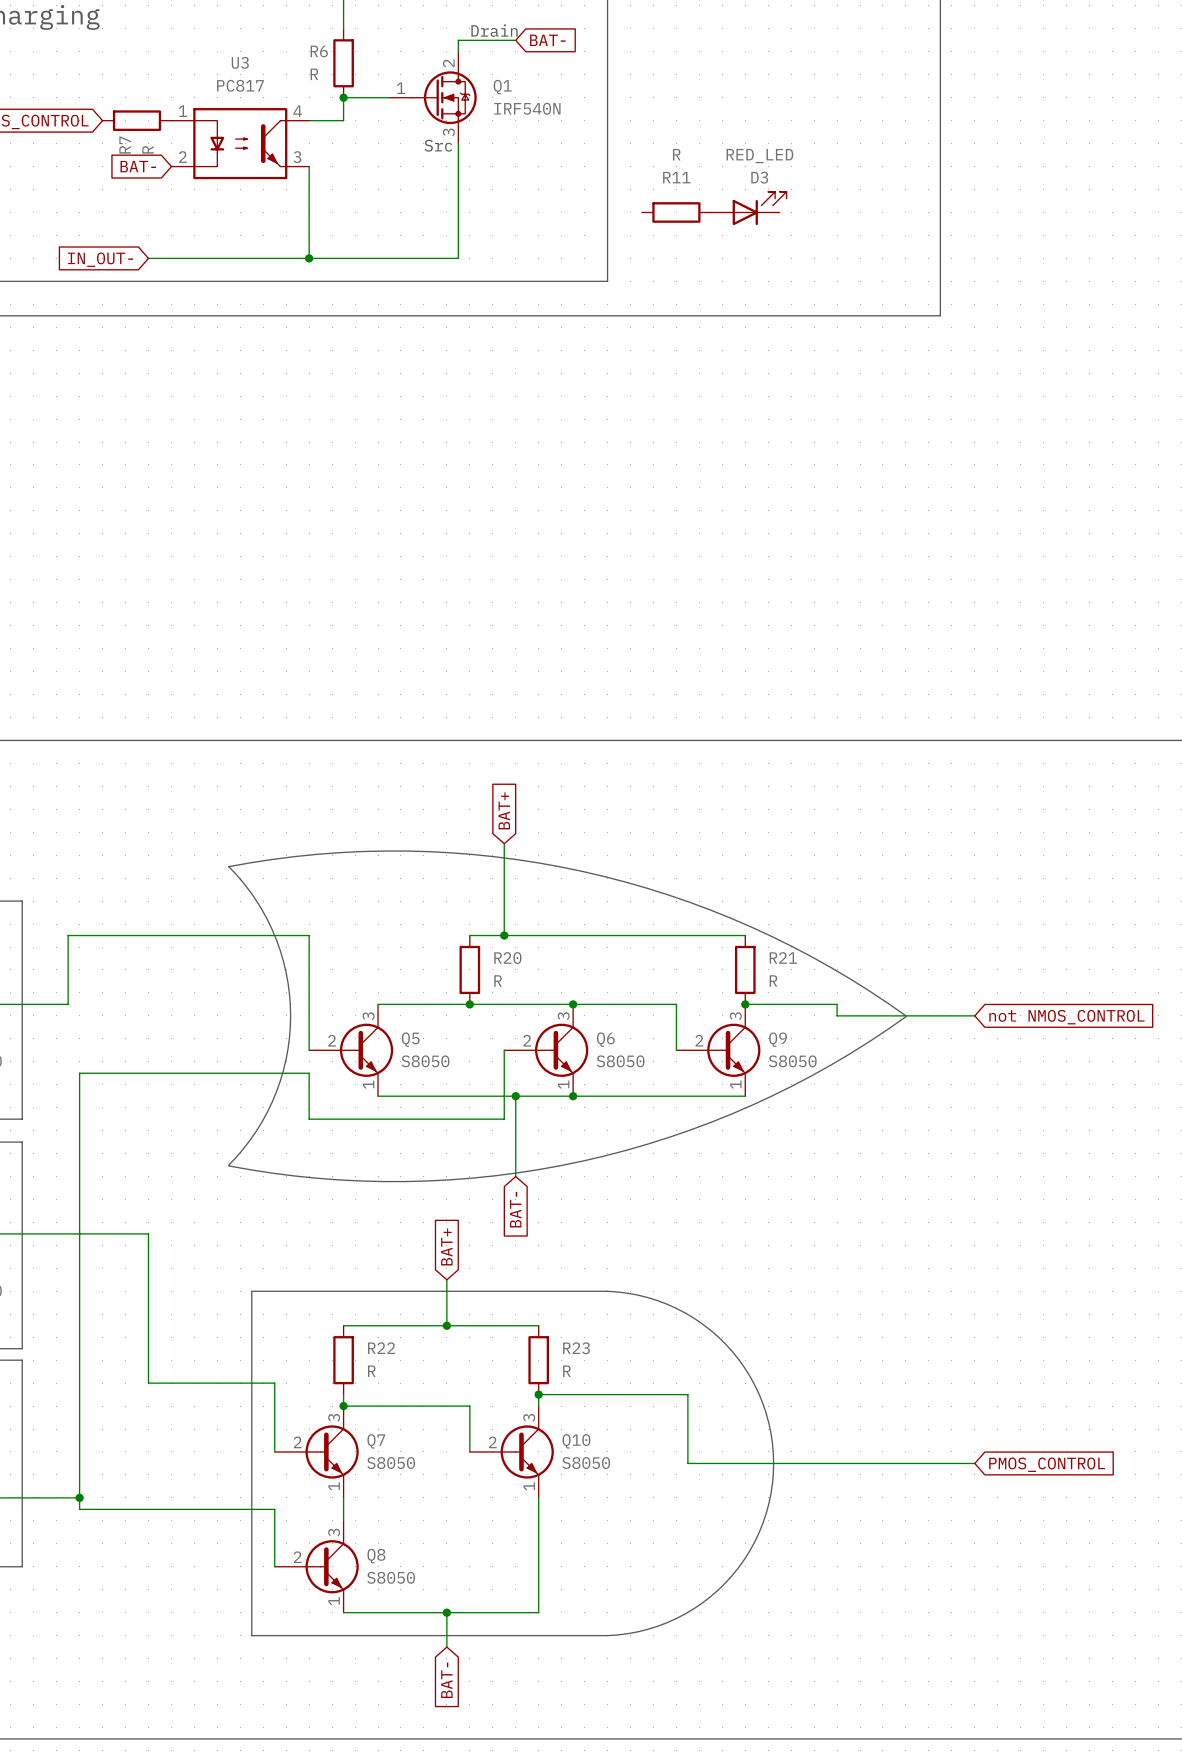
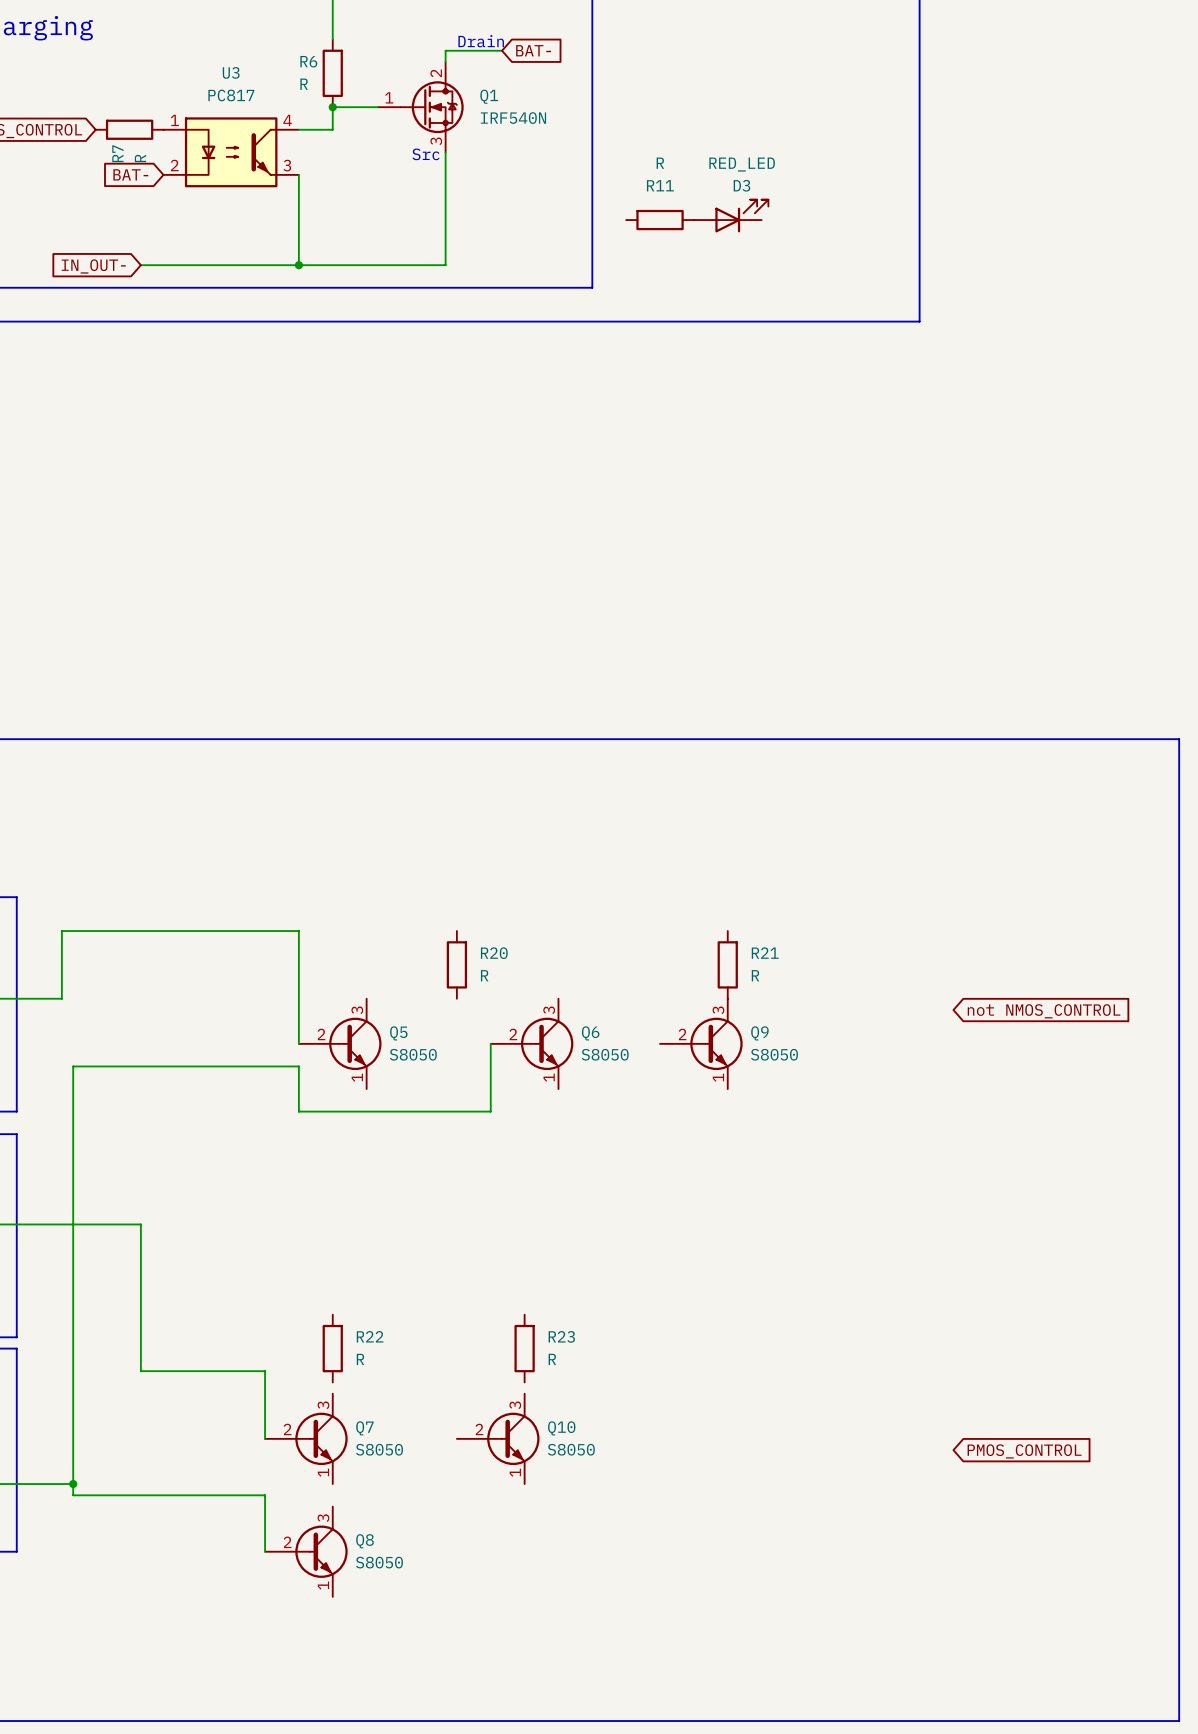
global label: BAT+ (504, 810) -> none
wire: (504, 843) (504, 935) -> none
wire: (469, 935) (745, 935) -> none
junction: (504, 935) -> none
wire: (378, 1004) (676, 1004) (676, 1050) -> none
junction: (469, 1004) -> none
junction: (573, 1004) -> none
wire: (745, 1004) (837, 1004) (837, 1015) (974, 1015) -> none
junction: (745, 1004) -> none
line: (905, 1015) (831, 967) (751, 927) (668, 895) (582, 871) (494, 856) (406, 851) (317, 854) (228, 866) (250, 891) (272, 930) (286, 972) (290, 1015) (286, 1059) (272, 1101) (250, 1139) (228, 1165) -> none
line: (905, 1016) (831, 1064) (751, 1105) (668, 1137) (582, 1161) (494, 1175) (406, 1181) (317, 1178) (228, 1165) -> none
wire: (378, 1096) (745, 1096) -> none
wire: (515, 1096) (515, 1176) -> none
junction: (515, 1096) -> none
junction: (573, 1096) -> none
global label: BAT- (515, 1209) -> none
global label: BAT+ (446, 1246) -> none
wire: (446, 1279) (446, 1325) -> none
line: (251, 1291) (607, 1291) (637, 1295) (676, 1308) (710, 1330) (732, 1351) (749, 1376) (766, 1413) (773, 1453) (772, 1483) (766, 1513) (754, 1541) (738, 1567) (710, 1596) (676, 1618) (637, 1631) (607, 1635) (251, 1635) (251, 1291) -> none
wire: (343, 1325) (538, 1325) -> none
junction: (446, 1325) -> none
wire: (343, 1394) (343, 1406) (469, 1406) (469, 1451) -> none
junction: (538, 1394) -> none
junction: (343, 1406) -> none
wire: (538, 1406) (538, 1394) (687, 1394) (687, 1463) (974, 1463) -> none
wire: (343, 1497) (343, 1520) -> none
wire: (538, 1497) (538, 1612) (343, 1612) -> none
wire: (446, 1612) (446, 1647) -> none
junction: (446, 1612) -> none
global label: BAT- (446, 1680) -> none

